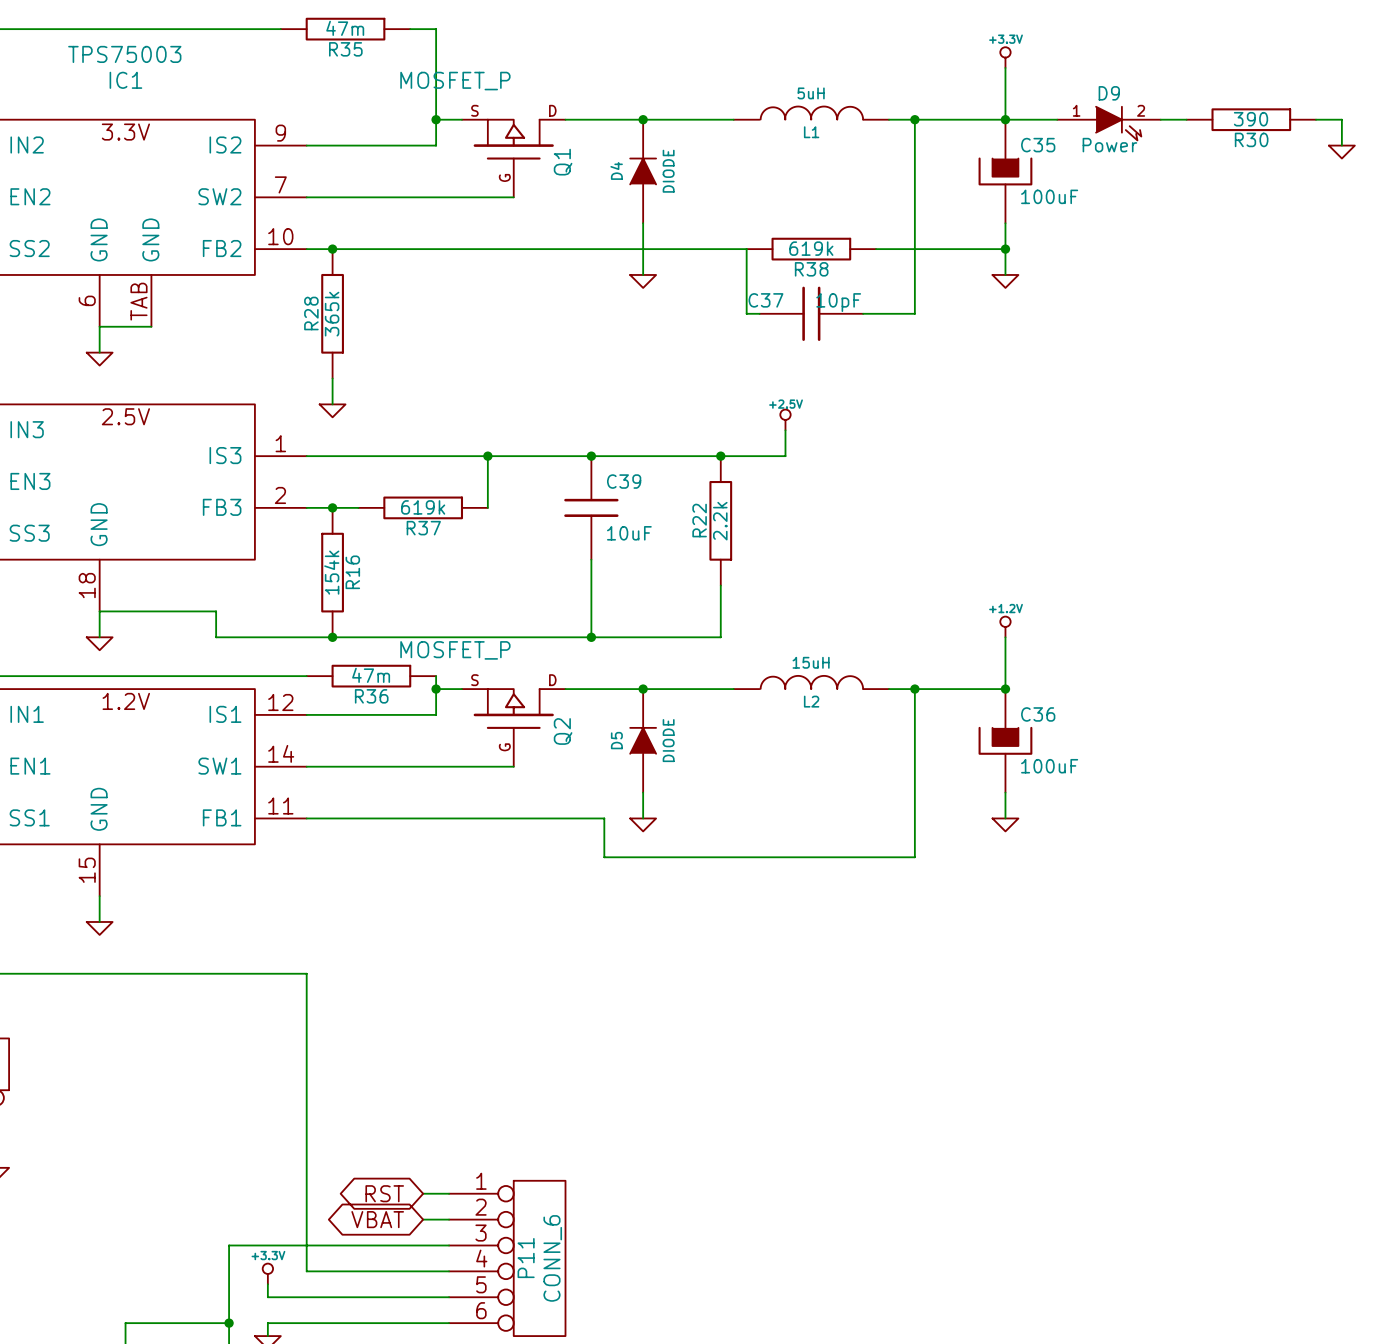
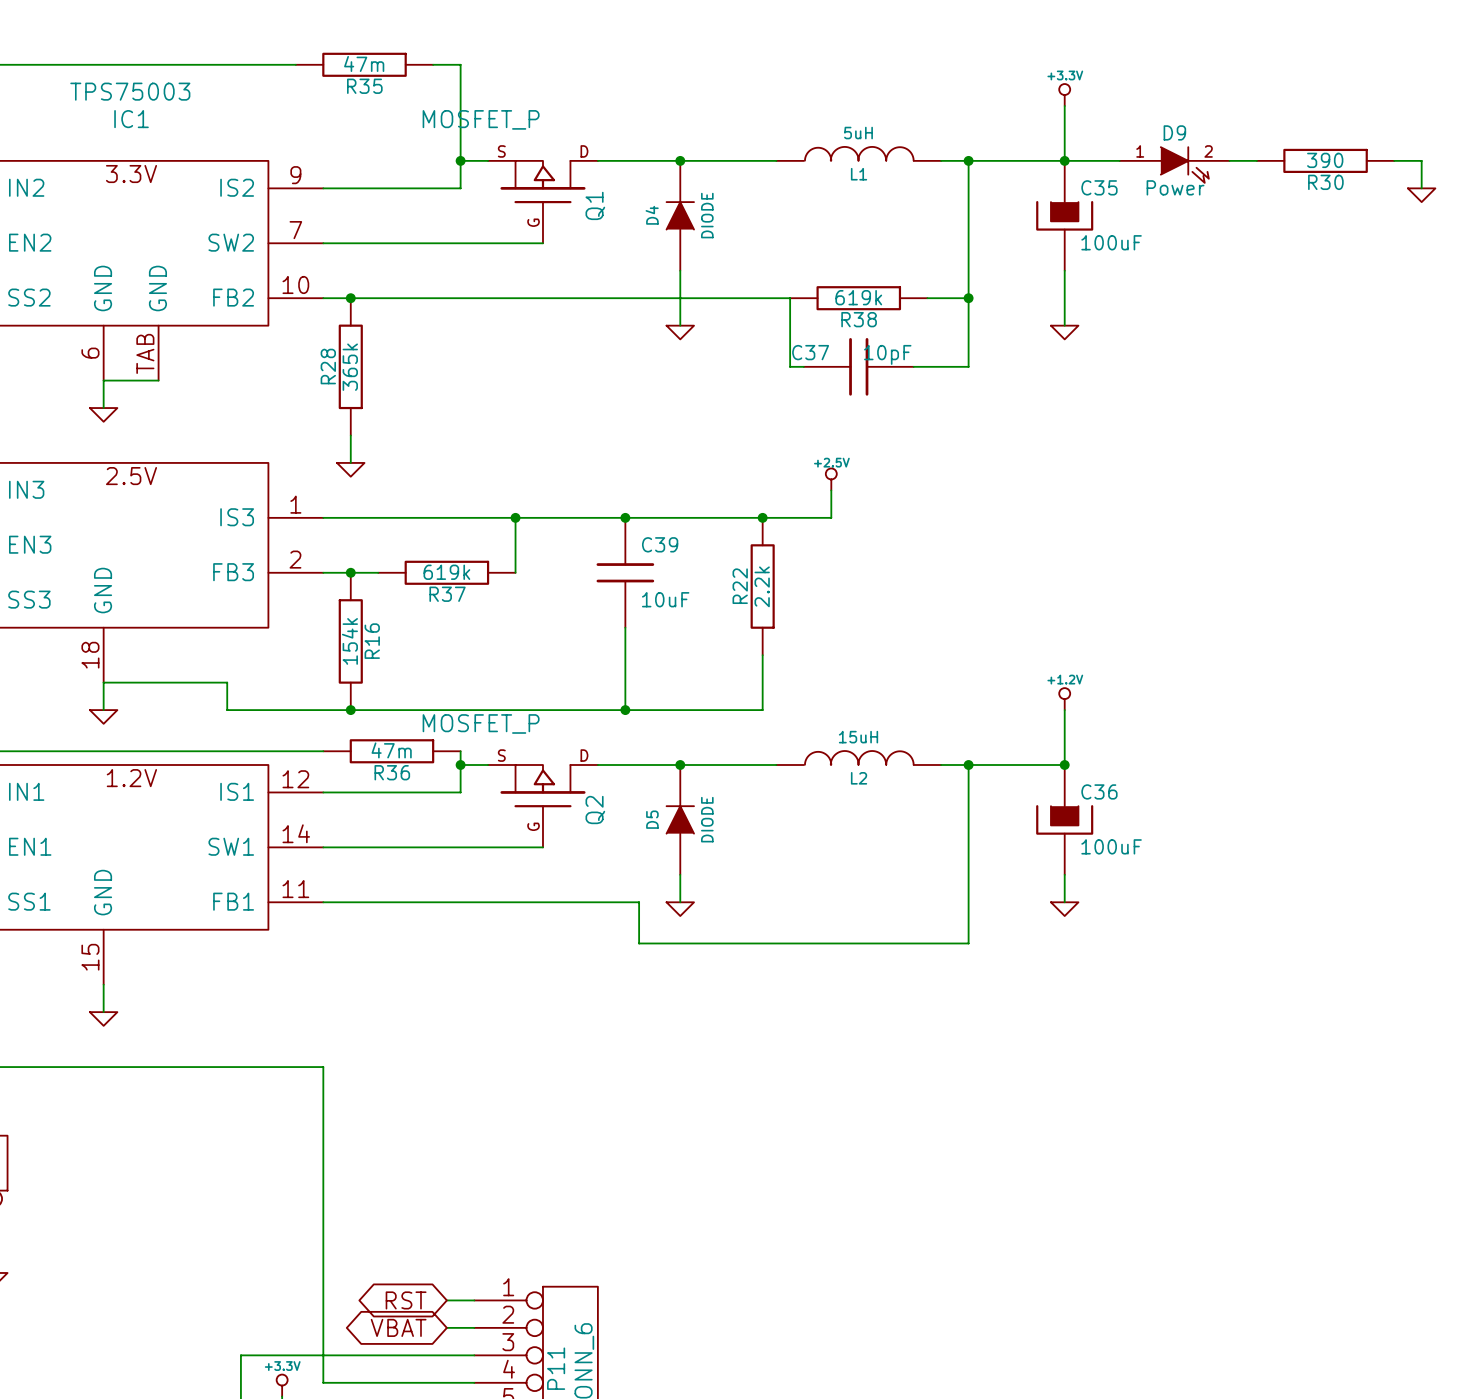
wire: (914, 249) (1005, 249) -> none
junction: none -> (968, 298)
junction: (1005, 249) -> none

